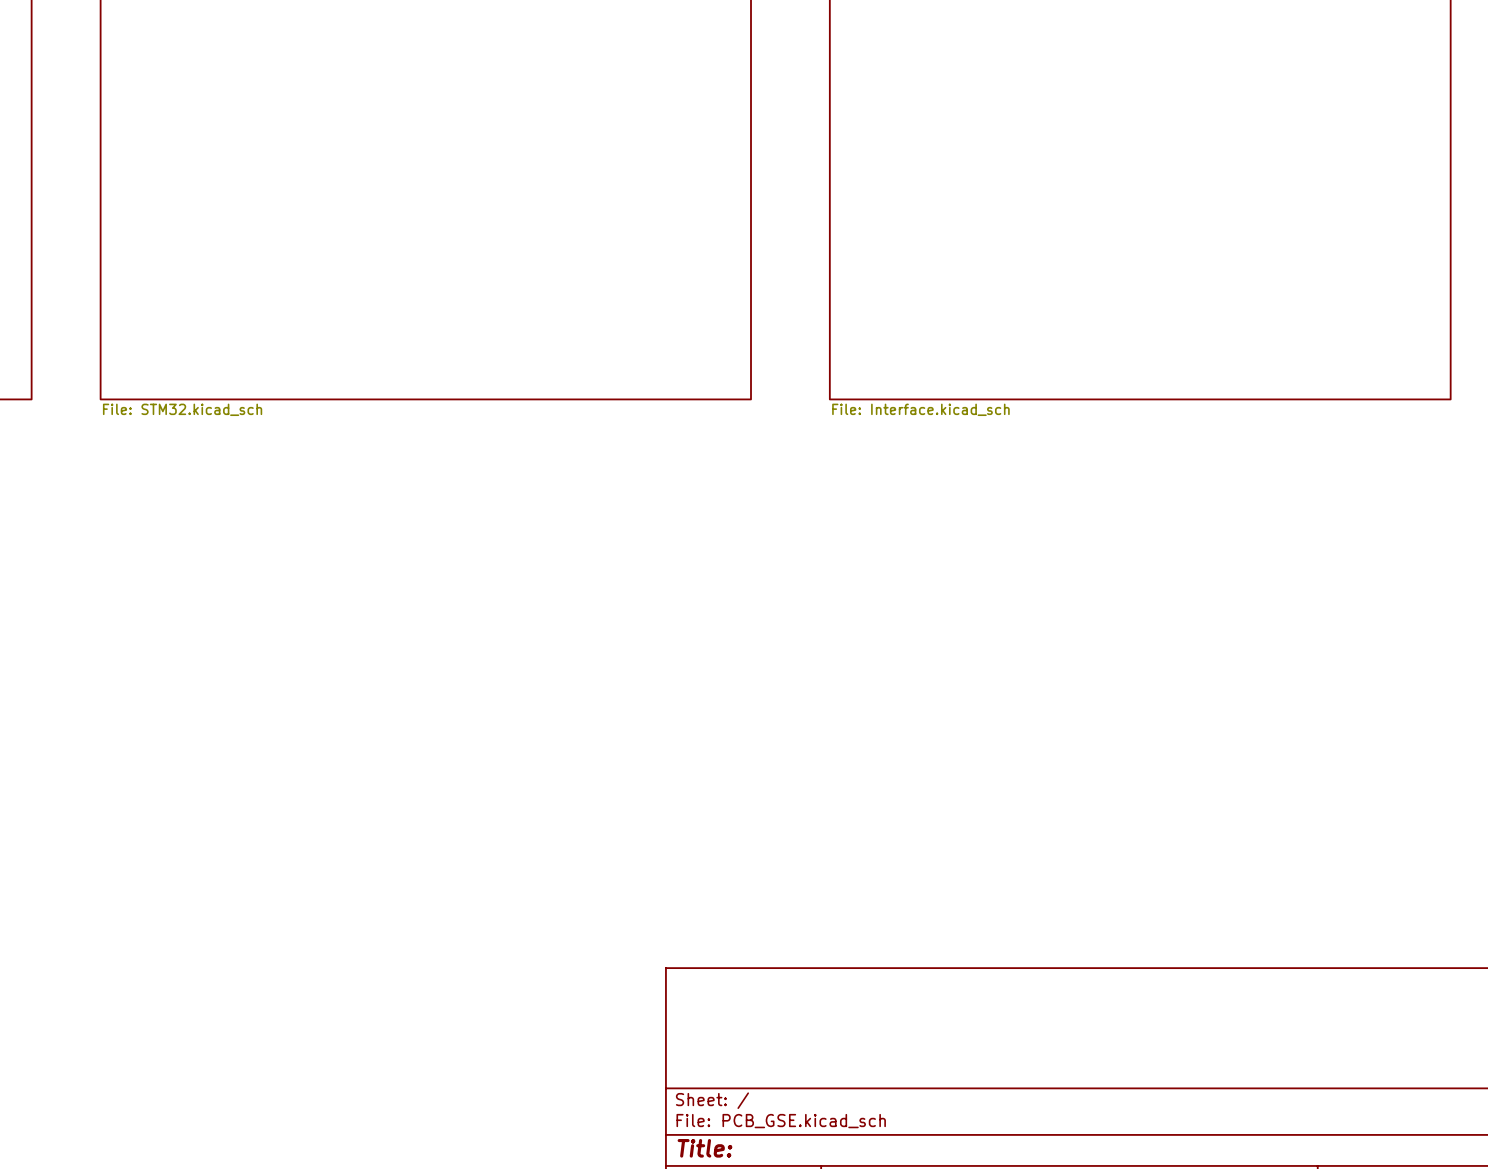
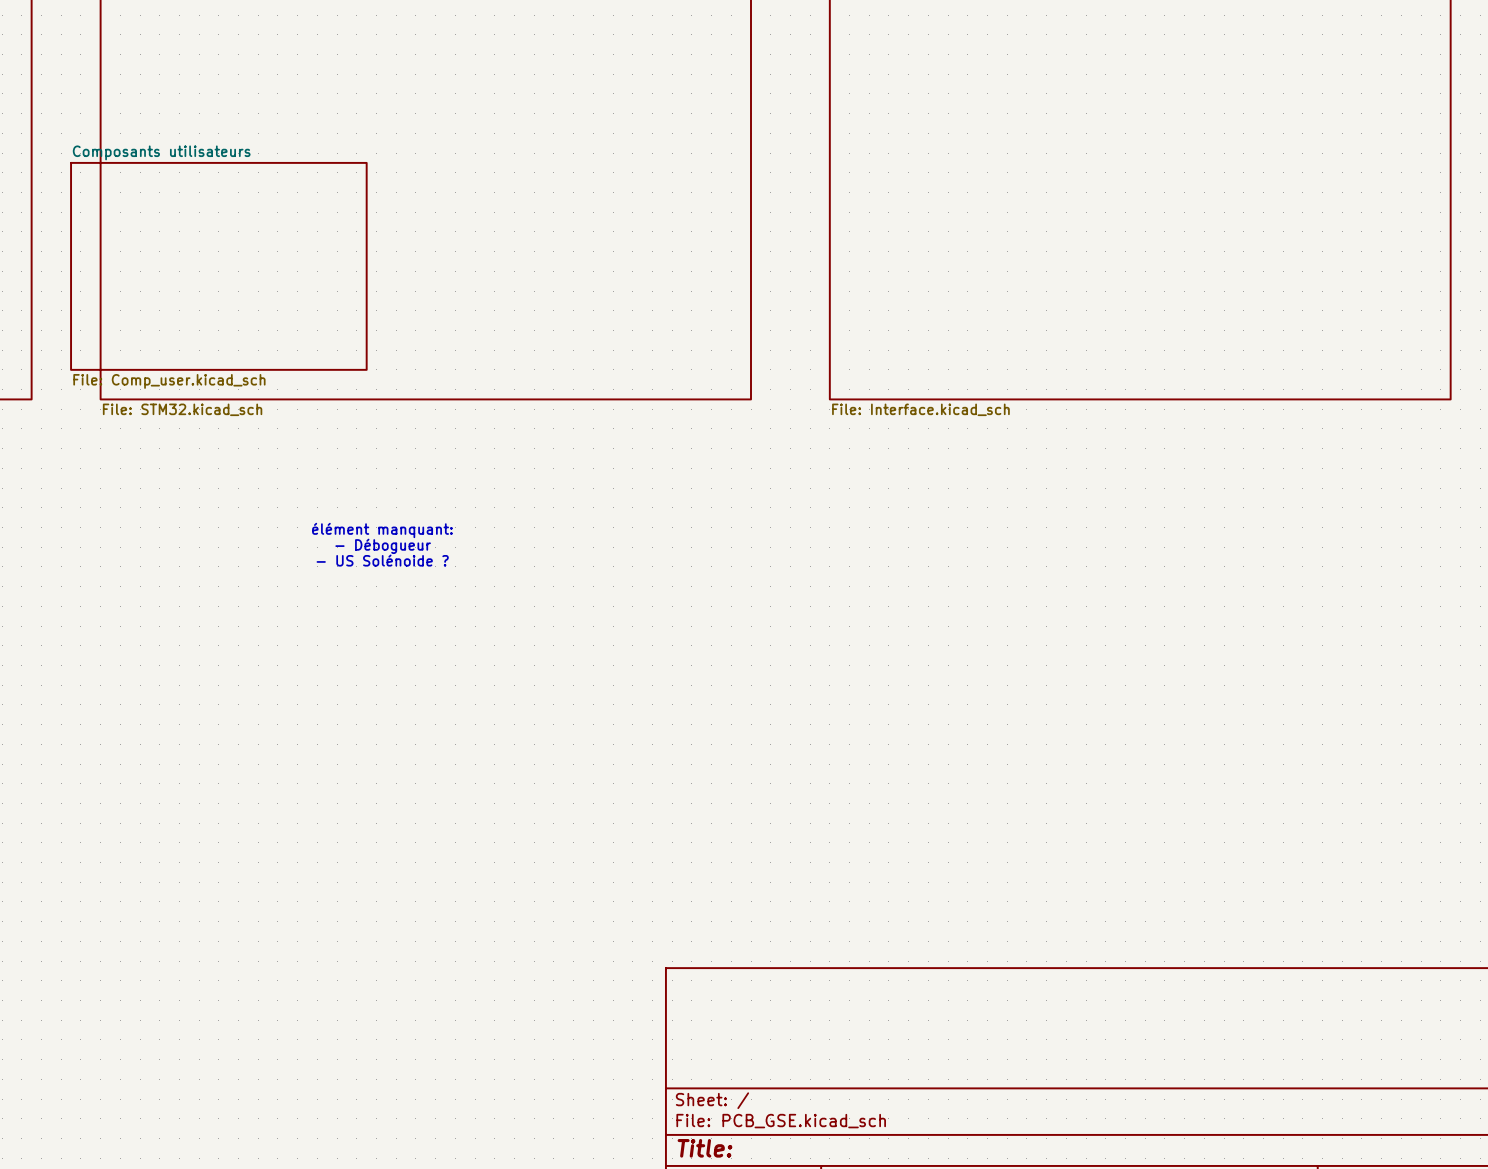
sheet Composants utilisateurs: none -> File: Comp_user.kicad_sch (218, 266)
text: none -> élément manquant: (382, 530)
text: none -> - Débogueur (383, 546)
text: none -> - US Solénoide ? (382, 560)

